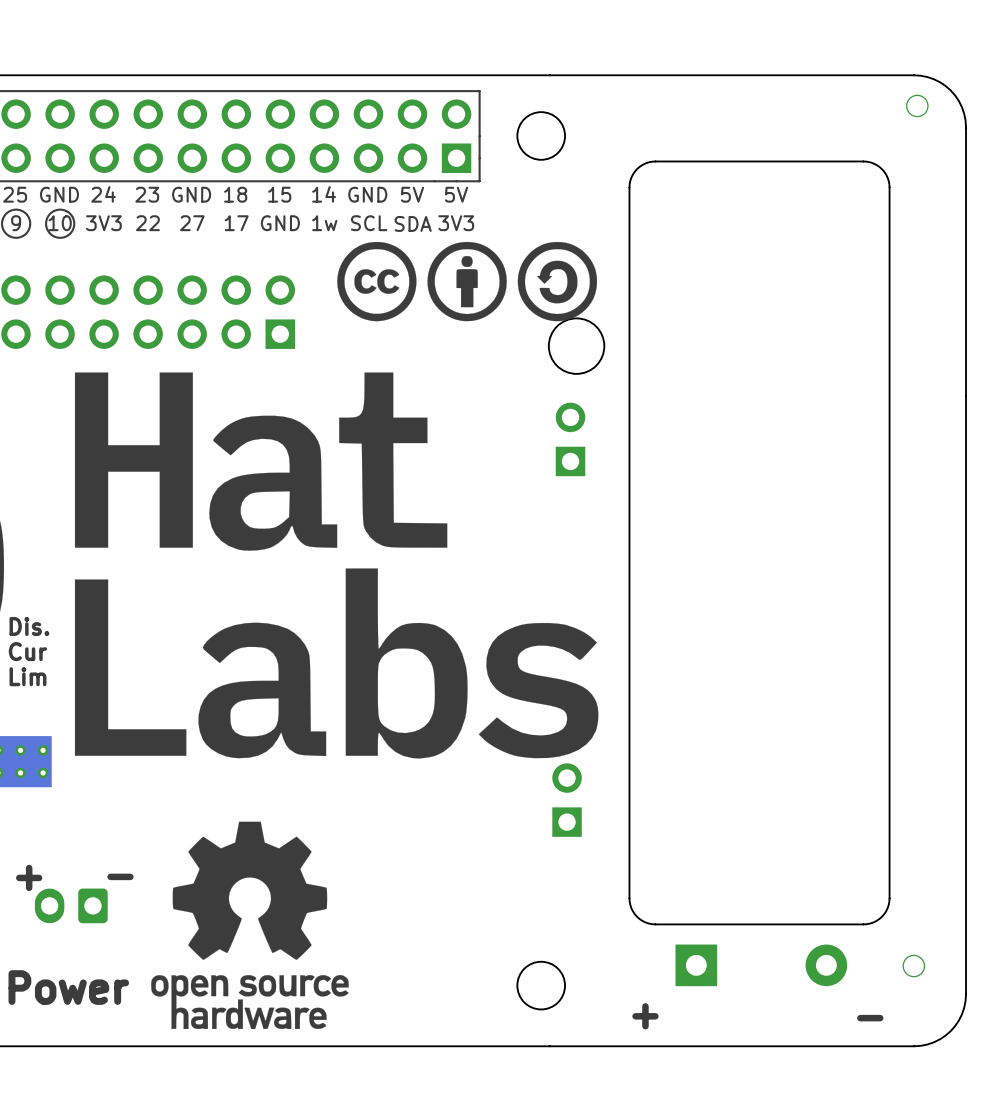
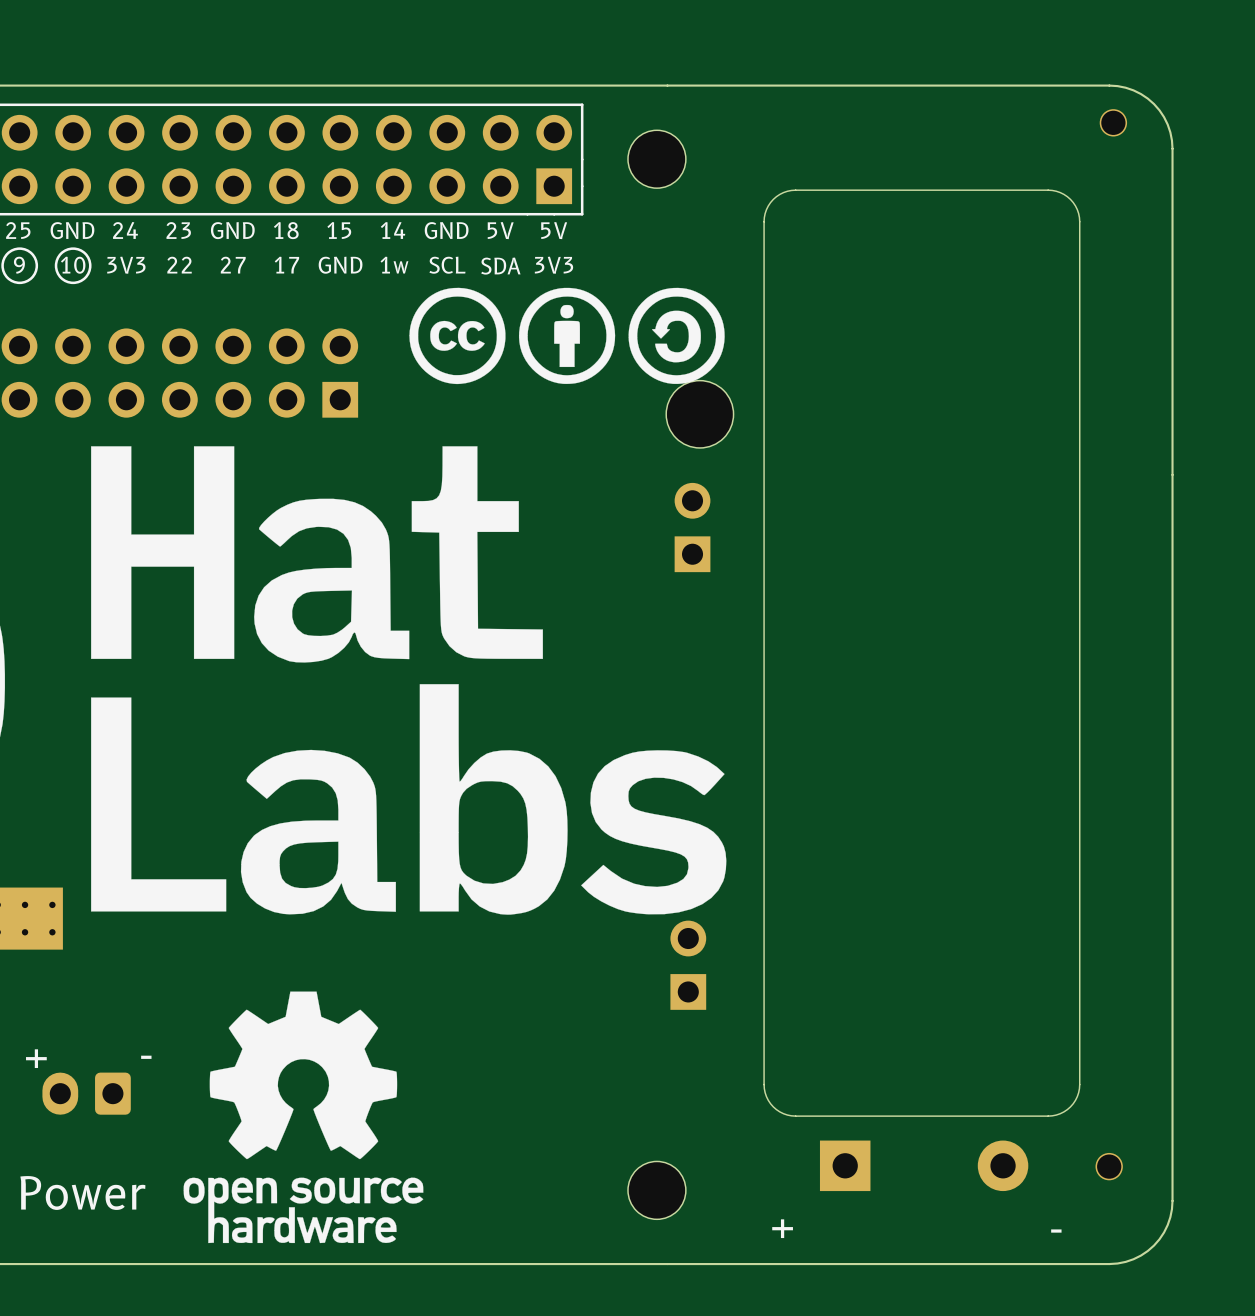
text: Dis. (29, 626) -> none
text: Cur (27, 651) -> none
text: Lim (27, 676) -> none

